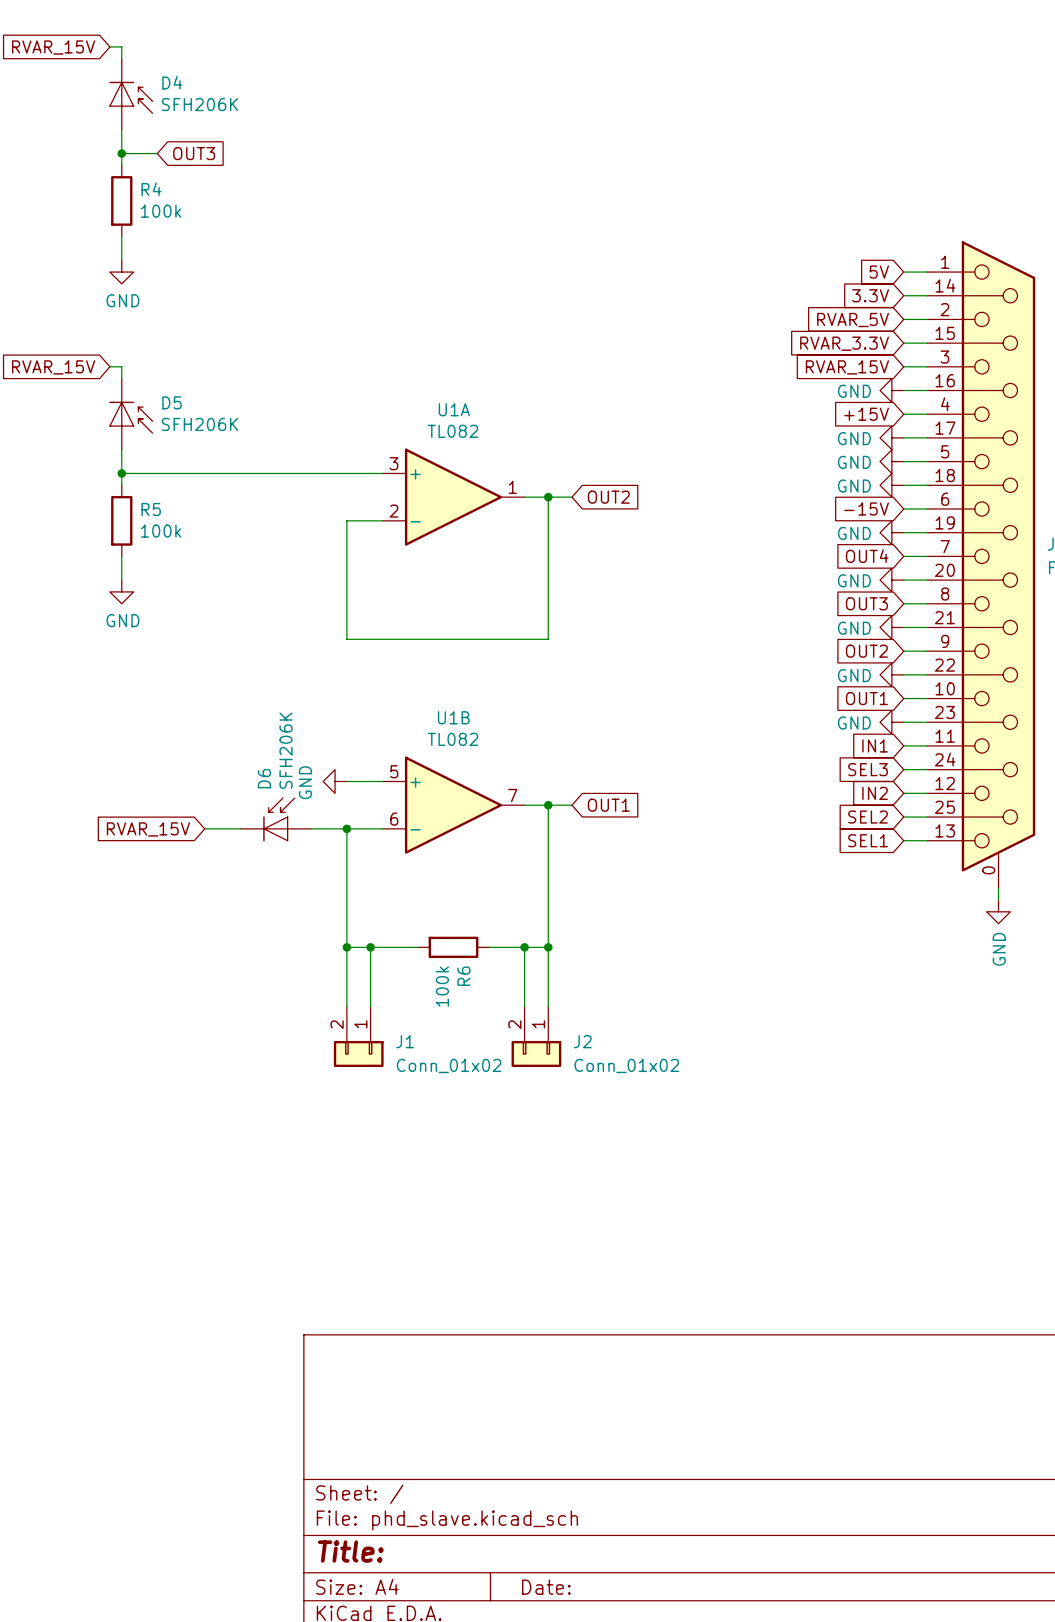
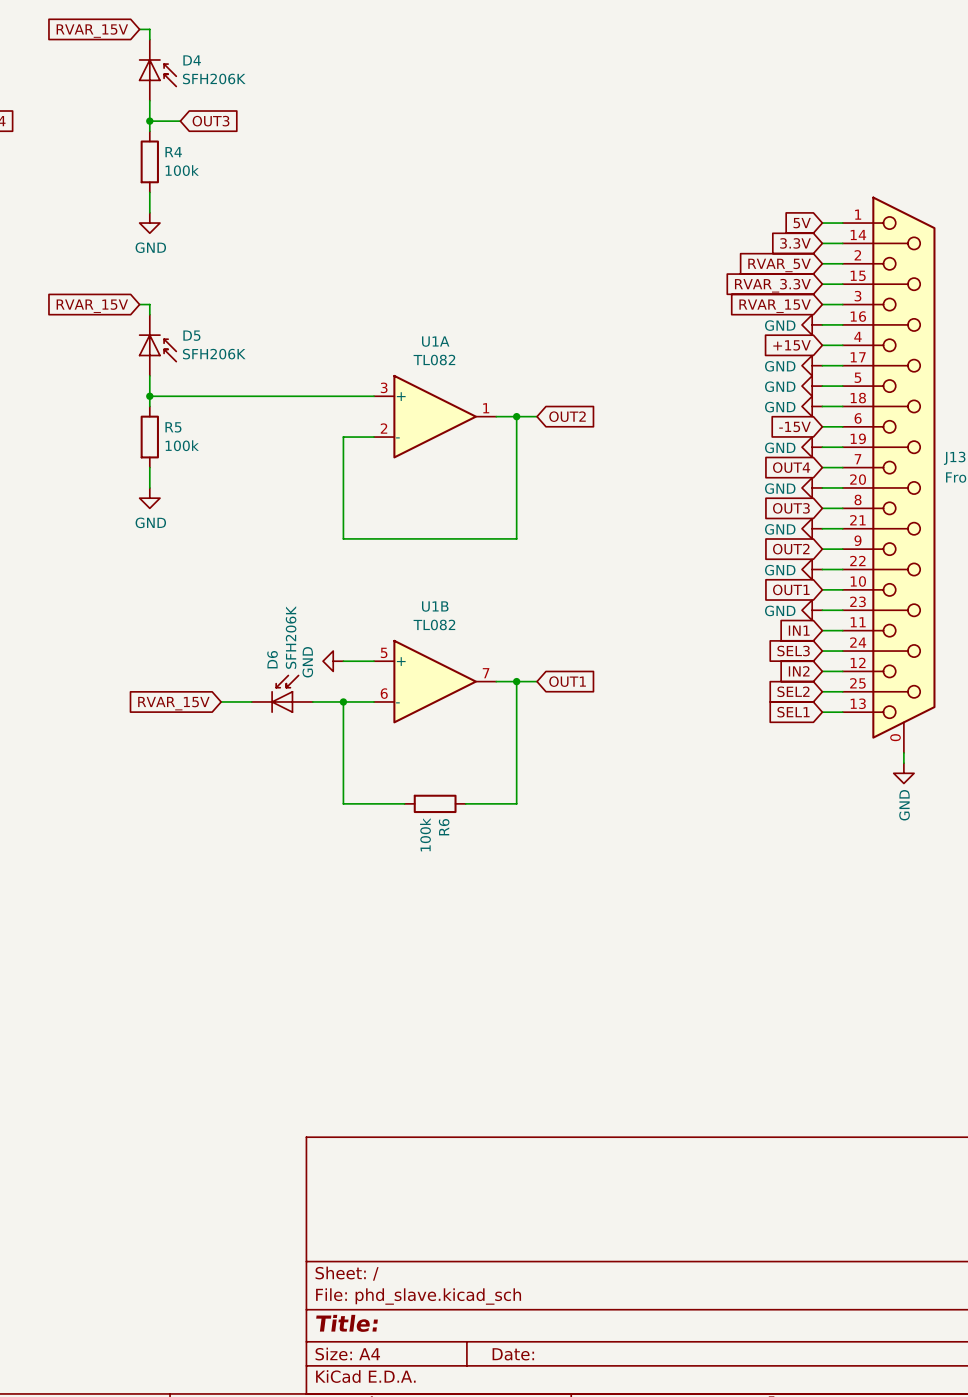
wire: (346, 947) (346, 1006) -> none
junction: (346, 947) -> none
wire: (370, 947) (370, 1006) -> none
junction: (370, 947) -> none
wire: (524, 947) (524, 1006) -> none
junction: (524, 947) -> none
wire: (548, 947) (548, 1006) -> none
junction: (548, 947) -> none
J1: Conn_01x02 (358, 1036) -> none
J2: Conn_01x02 (536, 1036) -> none

